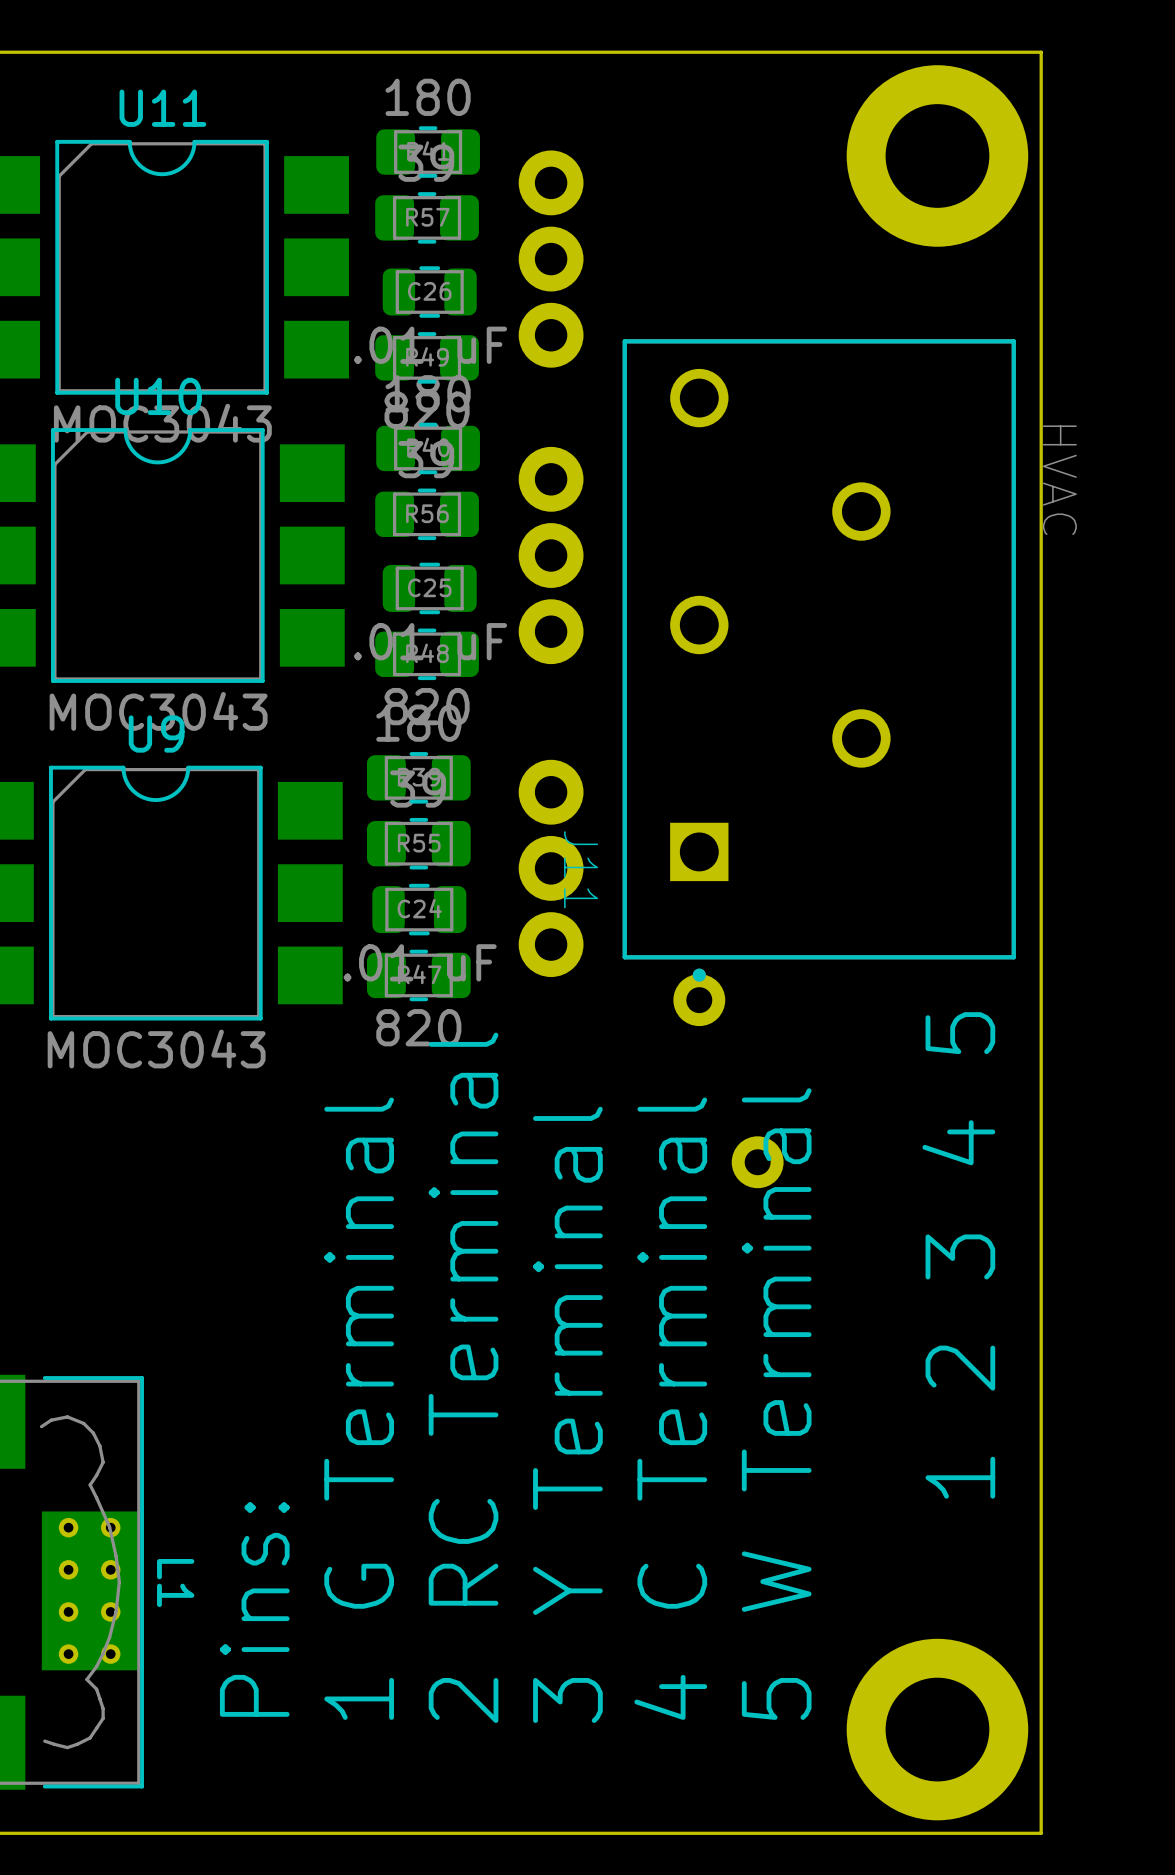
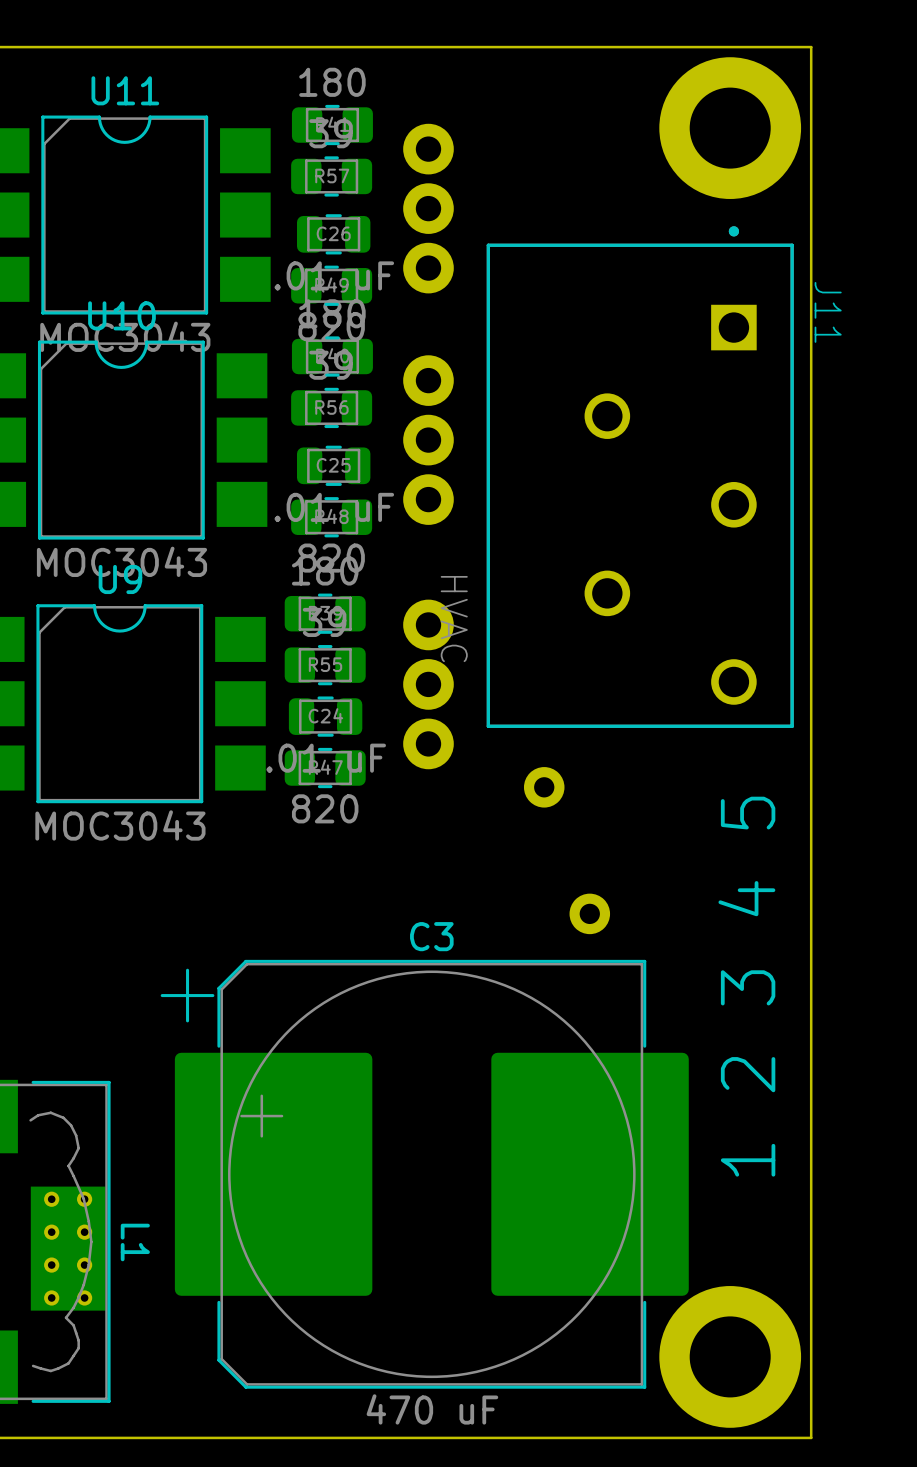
J11 rotation: 0° (819, 660) -> 180° (640, 477)
text: 2 RC Terminal (463, 1377) -> none
text: 5 W Terminal (776, 1404) -> none
text: 1 G Terminal (359, 1408) -> none
text: 4 C Terminal (670, 1408) -> none
text: 3 Y Terminal (567, 1414) -> none
C3: none -> 470 uF (424, 1174)
text: Pins: (254, 1609) -> none

